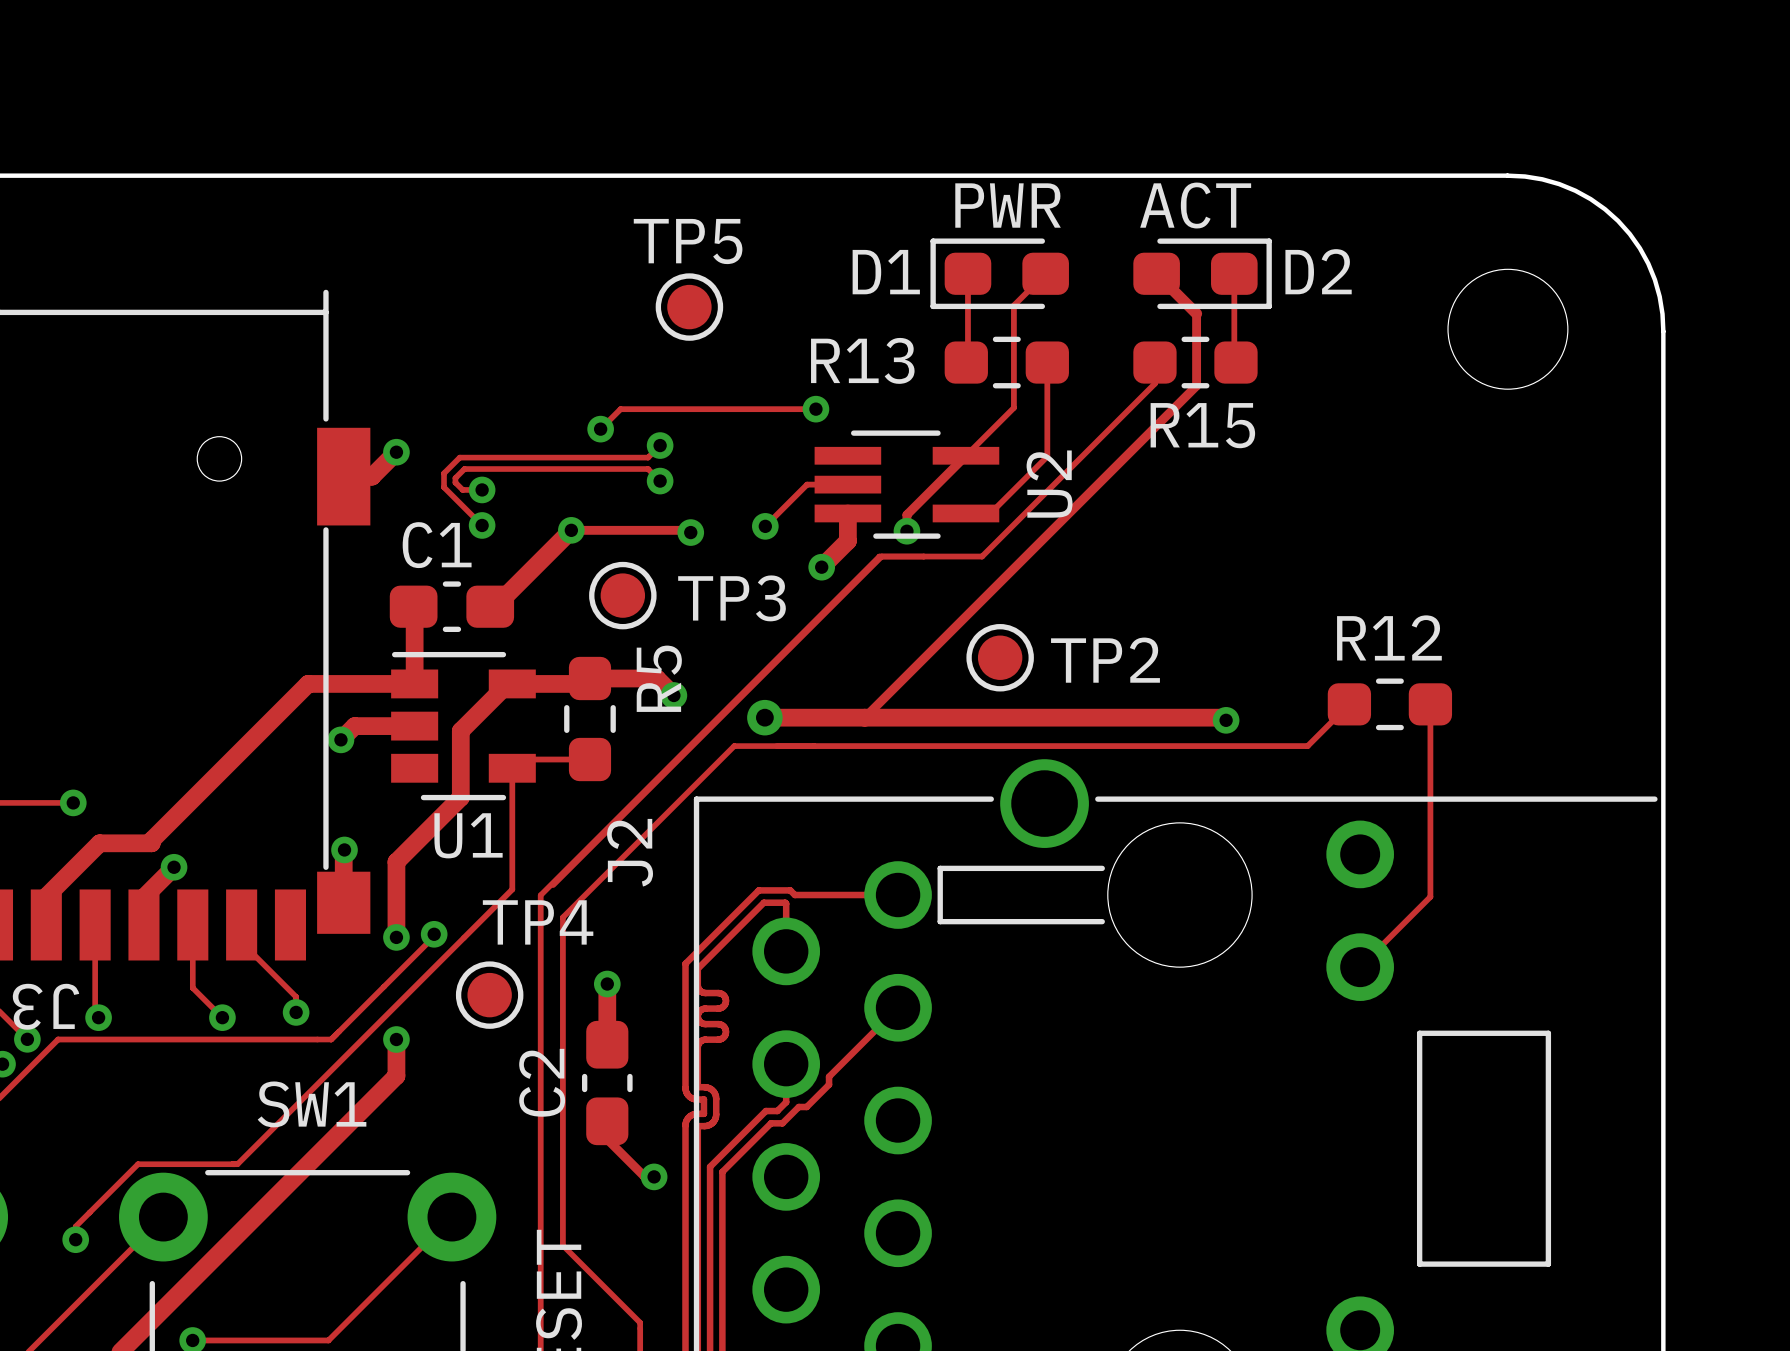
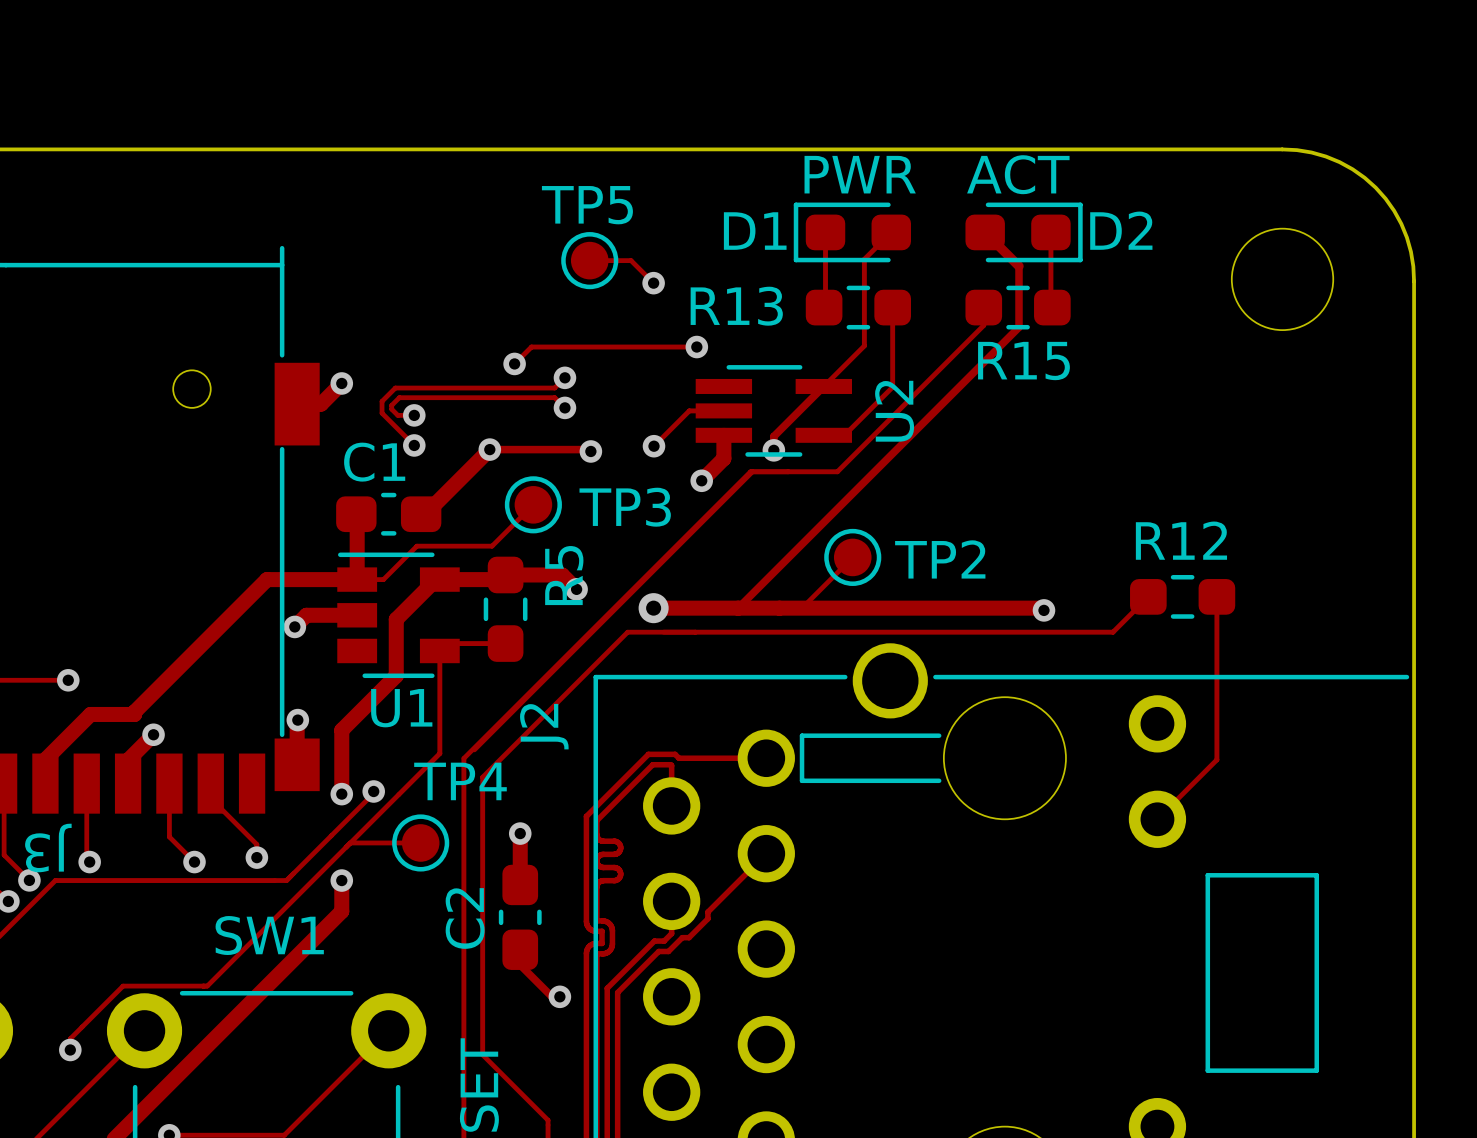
track: none -> (589, 260) (631, 260) (653, 283)
via: none -> (653, 283)
track: none -> (533, 504) (492, 546) (416, 546) (383, 579) (357, 579)
track: none -> (852, 557) (802, 608) (779, 608)
track: none -> (350, 842) (420, 842)

